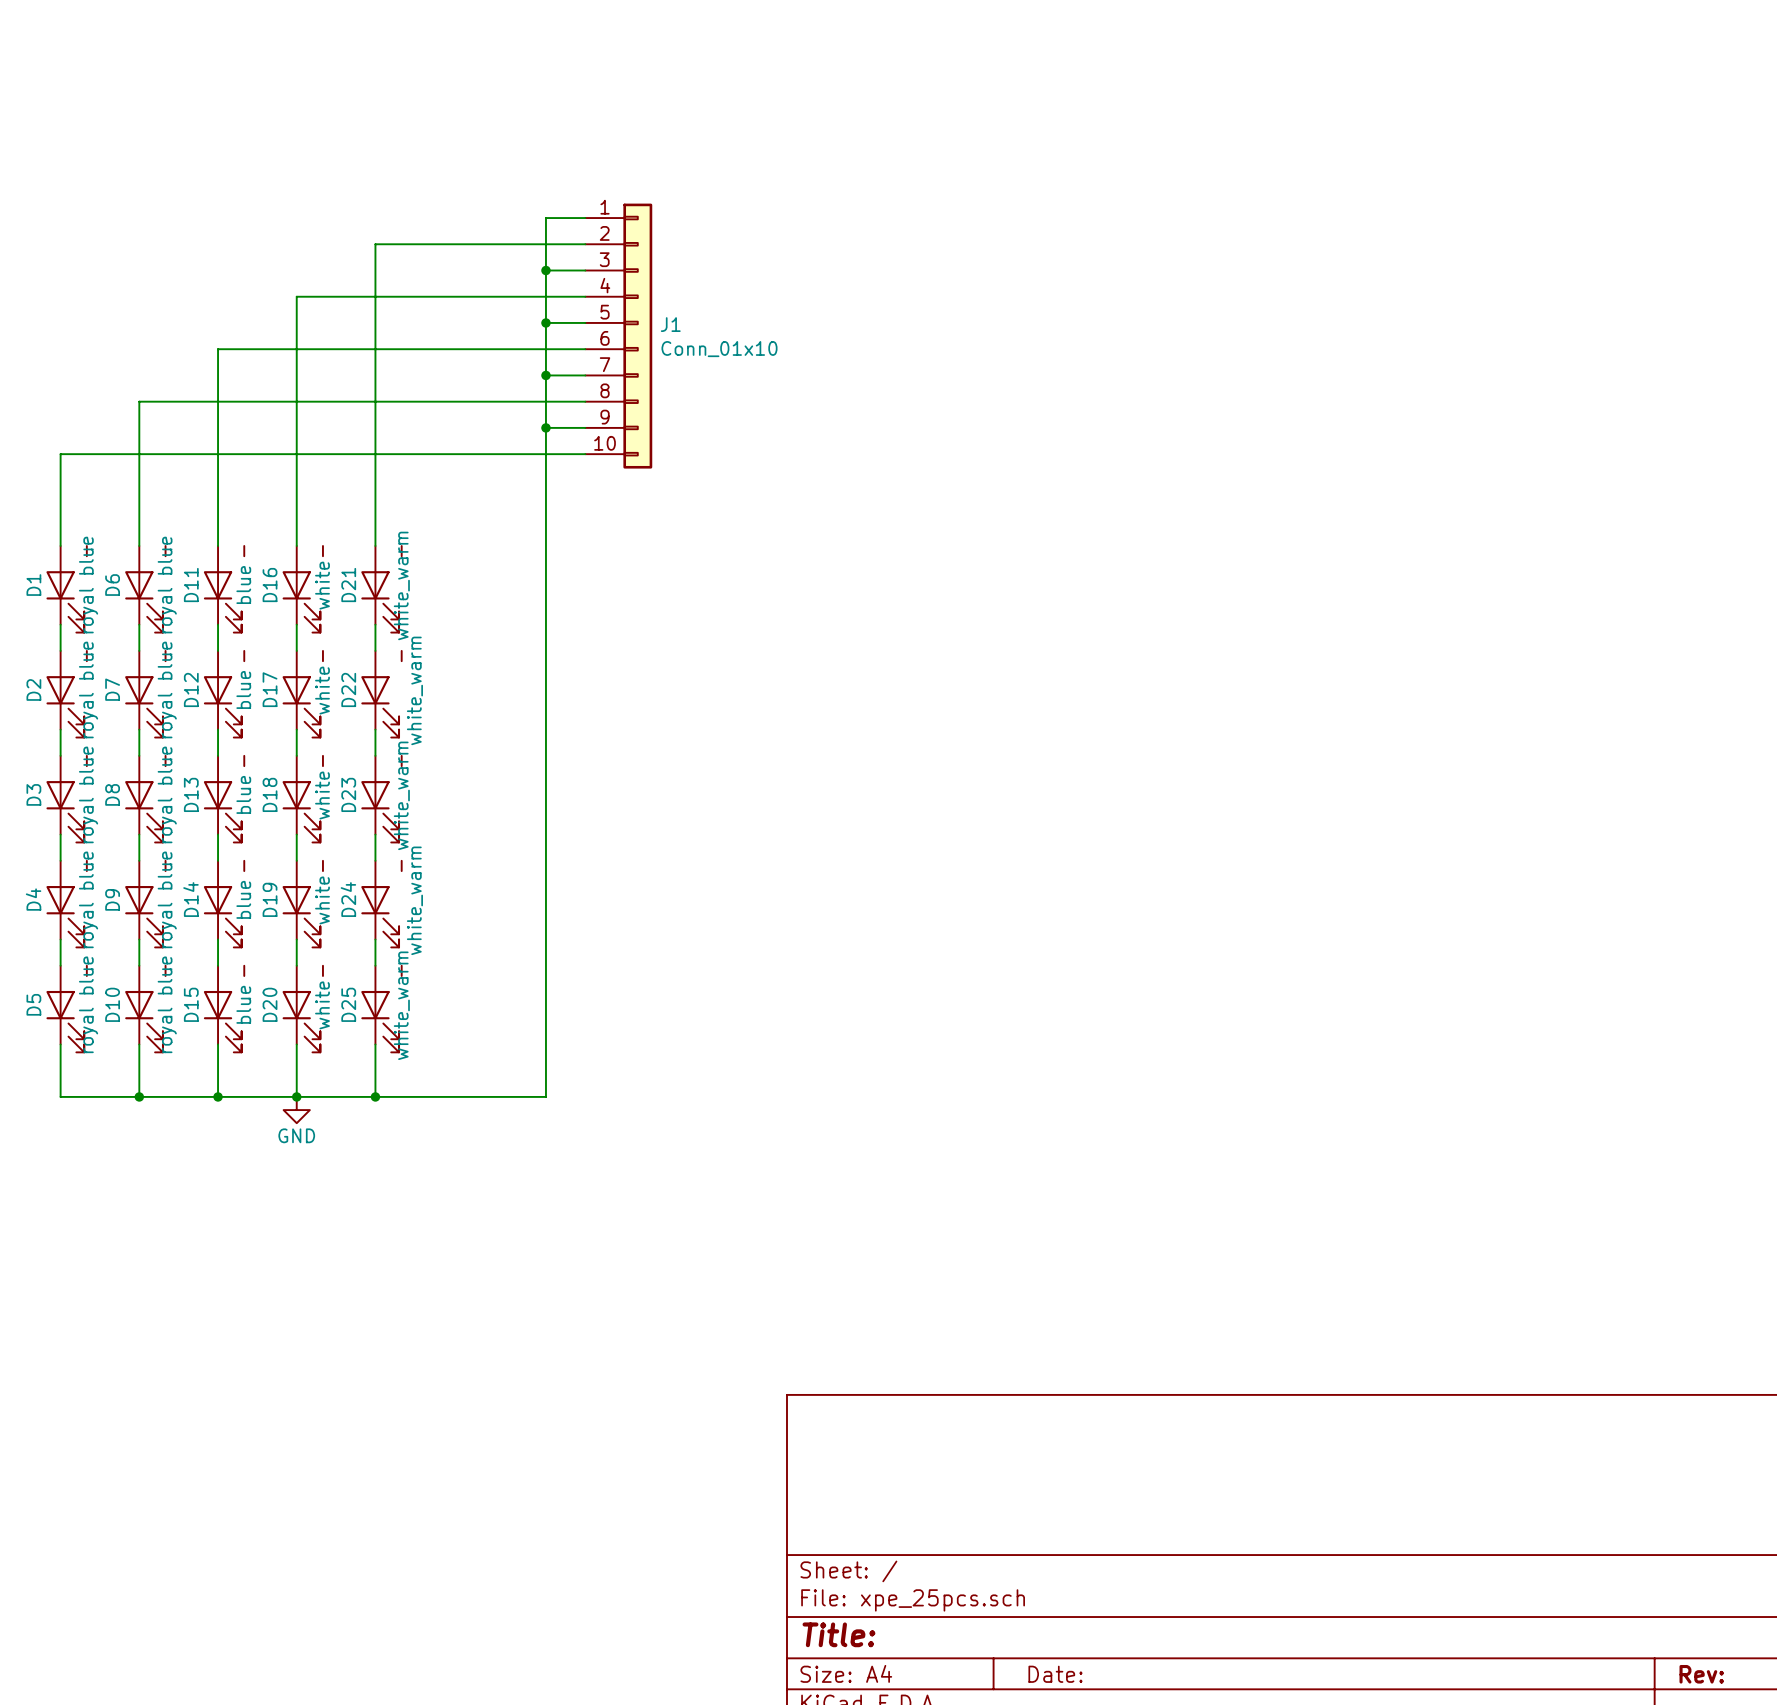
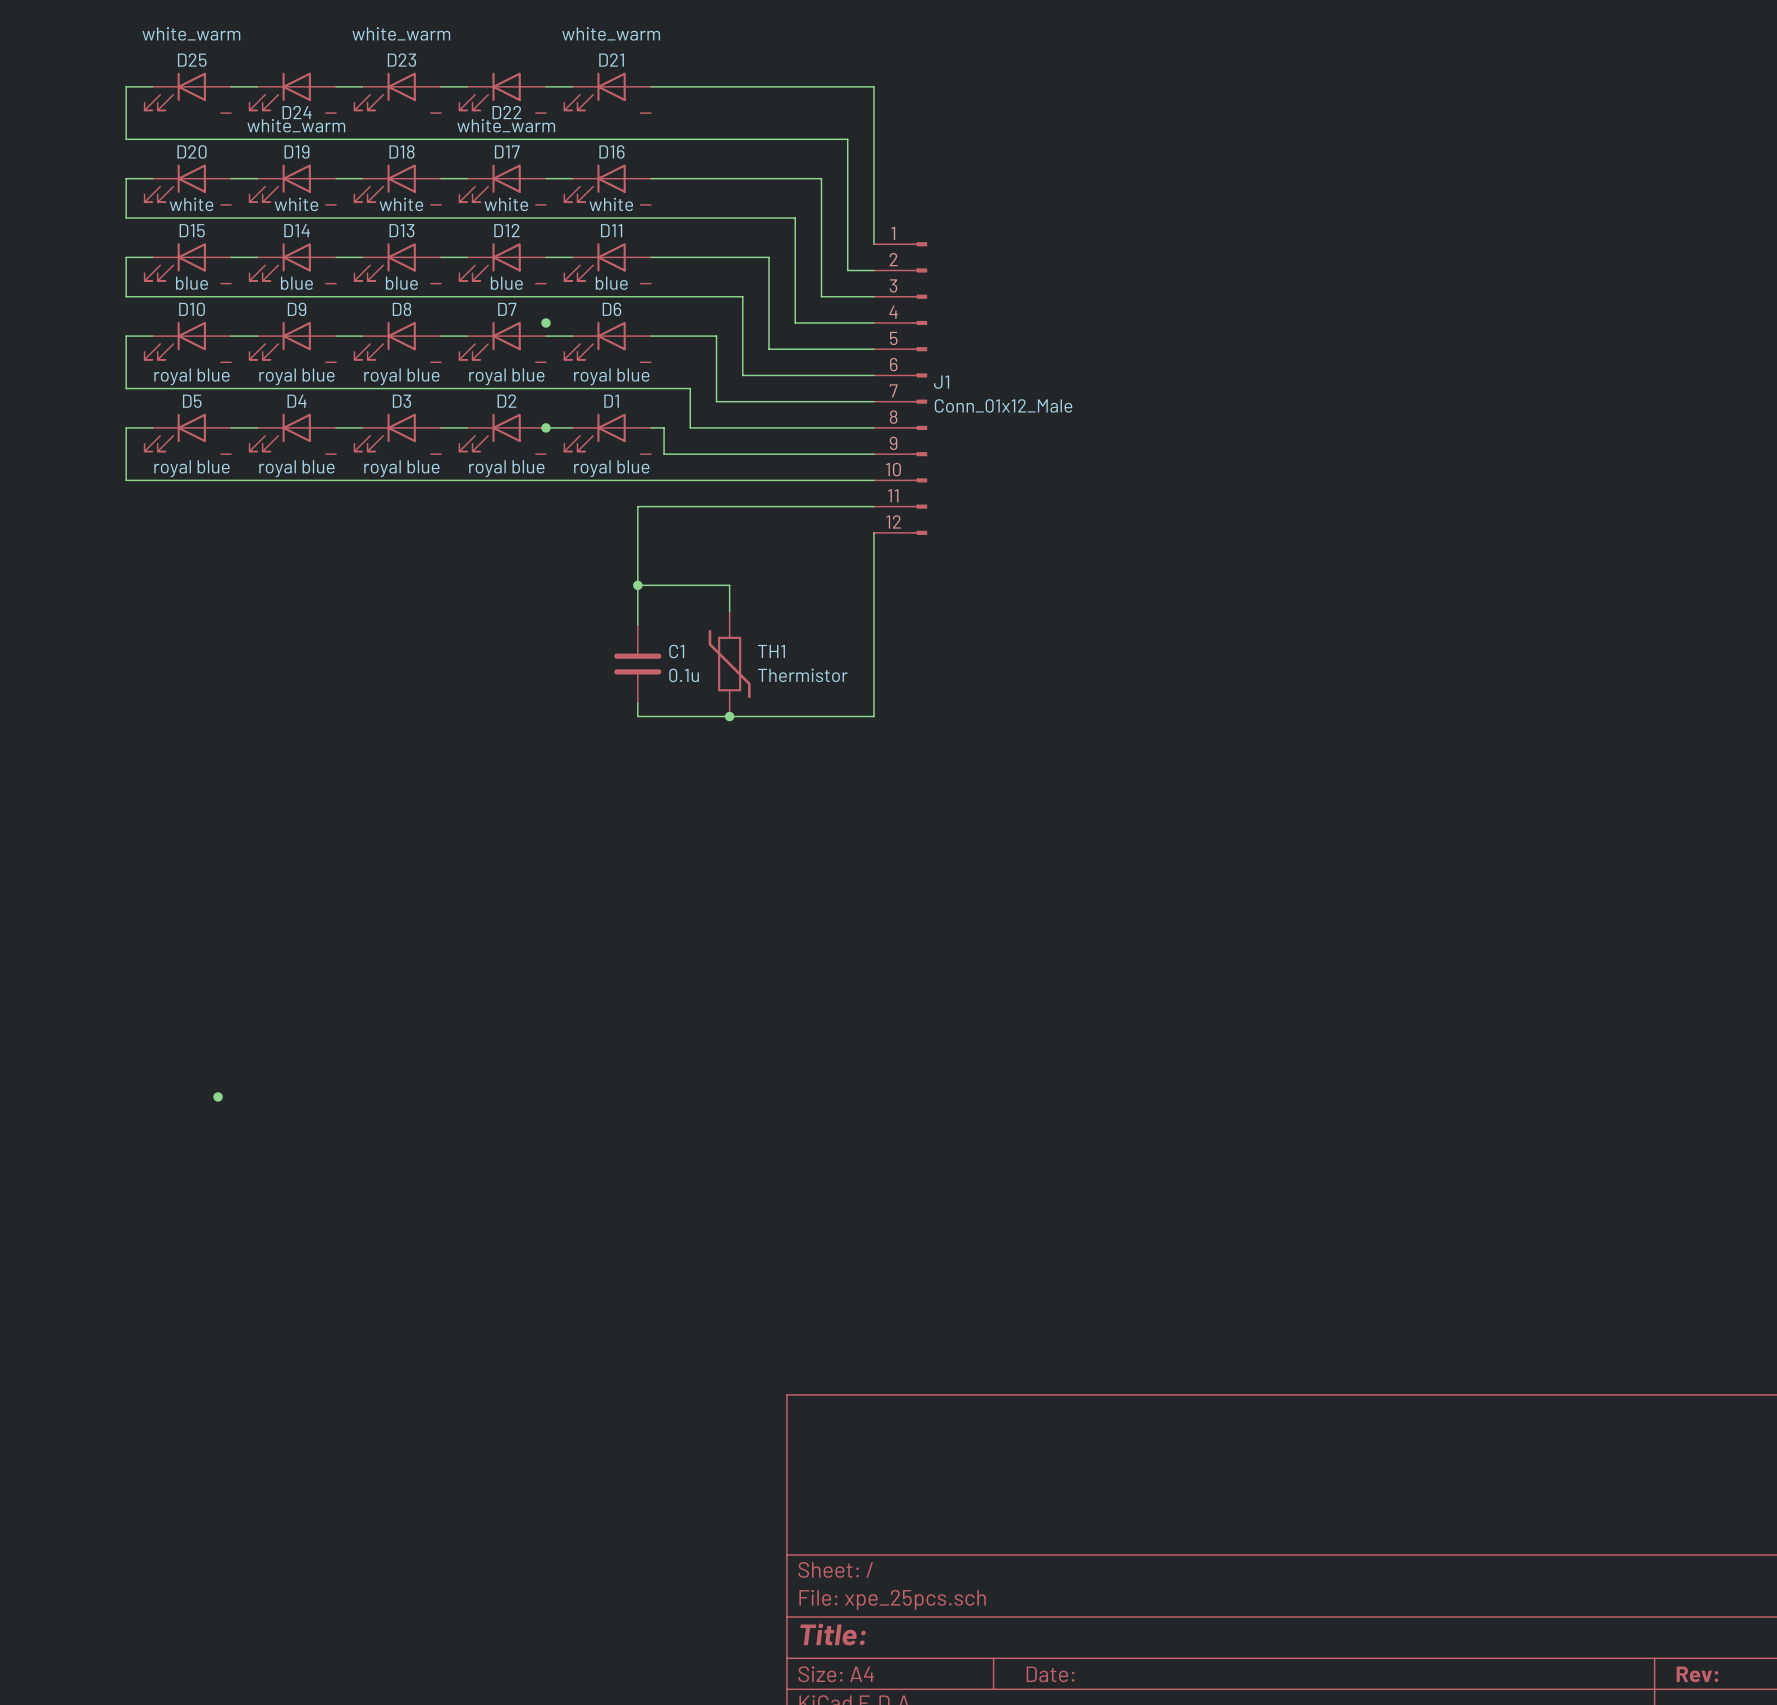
wire: none -> (152, 86) (126, 86) (126, 139) (847, 139) (847, 270) (873, 270)
wire: none -> (231, 86) (257, 86)
wire: none -> (336, 86) (362, 86)
wire: none -> (441, 86) (467, 86)
wire: none -> (545, 86) (572, 86)
wire: none -> (650, 86) (873, 86) (873, 244)
wire: none -> (231, 178) (257, 178)
wire: none -> (336, 178) (362, 178)
wire: none -> (441, 178) (467, 178)
wire: none -> (545, 178) (572, 178)
wire: none -> (650, 178) (821, 178) (821, 296) (873, 296)
J1 symbol: [585, 203, 653, 469] -> [873, 242, 928, 535]
wire: (545, 218) (545, 1096) (60, 1096) (60, 1044) -> (545, 218) (126, 218) (126, 178) (152, 178)
wire: none -> (585, 218) (795, 218) (795, 322) (873, 322)
wire: (585, 244) (375, 244) (375, 545) -> none
wire: none -> (231, 257) (257, 257)
wire: none -> (336, 257) (362, 257)
wire: none -> (441, 257) (467, 257)
wire: none -> (545, 257) (572, 257)
wire: none -> (650, 257) (768, 257) (768, 349) (873, 349)
wire: (545, 270) (585, 270) -> none
junction: (545, 270) -> none
wire: (296, 296) (296, 545) -> (296, 296) (126, 296) (126, 257) (152, 257)
wire: none -> (585, 296) (742, 296) (742, 375) (873, 375)
wire: (545, 322) (585, 322) -> none
wire: none -> (152, 336) (126, 336) (126, 388) (690, 388) (690, 427) (873, 427)
wire: none -> (231, 336) (257, 336)
wire: none -> (336, 336) (362, 336)
wire: none -> (441, 336) (467, 336)
wire: none -> (545, 336) (572, 336)
wire: none -> (650, 336) (716, 336) (716, 401) (873, 401)
wire: (585, 349) (218, 349) (218, 545) -> none
J1 value: Conn_01x10 (719, 349) -> Conn_01x12_Male (1003, 405)
wire: (545, 375) (585, 375) -> none
junction: (545, 375) -> none
wire: (585, 401) (139, 401) (139, 545) -> none
wire: none -> (152, 427) (126, 427) (126, 480) (873, 480)
wire: none -> (231, 427) (257, 427)
wire: none -> (336, 427) (362, 427)
wire: none -> (441, 427) (467, 427)
wire: none -> (650, 427) (664, 427) (664, 454) (873, 454)
wire: (585, 454) (60, 454) (60, 545) -> none
wire: none -> (873, 506) (637, 506) (637, 624)
wire: none -> (873, 532) (873, 716) (637, 716) (637, 703)
D21 value position: white_warm (401, 585) -> white_warm (611, 33)
wire: none -> (637, 585) (729, 585) (729, 611)
junction: none -> (637, 585)
D1 position: (66, 589) -> (607, 433)
D6 position: (145, 589) -> (607, 342)
D11 position: (224, 589) -> (607, 263)
D16 position: (302, 589) -> (607, 184)
D21 position: (381, 589) -> (607, 92)
D1 rotation: 0° (65, 601) -> 90° clockwise (595, 432)
D6 rotation: 0° (144, 601) -> 90° clockwise (595, 340)
D11 rotation: 0° (222, 601) -> 90° clockwise (595, 262)
D16 rotation: 0° (301, 601) -> 90° clockwise (595, 183)
D21 rotation: 0° (380, 601) -> 90° clockwise (595, 91)
wire: (60, 624) (60, 650) -> none
wire: (139, 624) (139, 650) -> none
wire: (218, 624) (218, 650) -> none
wire: (296, 624) (296, 650) -> none
wire: (375, 624) (375, 650) -> none
C1: none -> 0.1u (637, 664)
TH1: none -> Thermistor (729, 664)
D22 name position: D22 (348, 689) -> D22 (506, 112)
D2 position: (66, 694) -> (502, 433)
D7 position: (145, 694) -> (502, 342)
D12 position: (224, 694) -> (502, 263)
D17 position: (302, 694) -> (502, 184)
D22 position: (381, 694) -> (502, 92)
D2 rotation: 0° (65, 706) -> 90° clockwise (490, 432)
D7 rotation: 0° (144, 706) -> 90° clockwise (490, 340)
D12 rotation: 0° (222, 706) -> 90° clockwise (490, 262)
D17 rotation: 0° (301, 706) -> 90° clockwise (490, 183)
D22 rotation: 0° (380, 706) -> 90° clockwise (490, 91)
junction: none -> (729, 716)
wire: (60, 729) (60, 755) -> none
wire: (139, 729) (139, 755) -> none
wire: (218, 729) (218, 755) -> none
wire: (296, 729) (296, 755) -> none
wire: (375, 729) (375, 755) -> none
D23 value position: white_warm (401, 795) -> white_warm (401, 33)
D3 position: (66, 799) -> (397, 433)
D8 position: (145, 799) -> (397, 342)
D13 position: (224, 799) -> (397, 263)
D18 position: (302, 799) -> (397, 184)
D23 position: (381, 799) -> (397, 92)
D3 rotation: 0° (65, 811) -> 90° clockwise (385, 432)
D8 rotation: 0° (144, 811) -> 90° clockwise (385, 340)
D13 rotation: 0° (222, 811) -> 90° clockwise (385, 262)
D18 rotation: 0° (301, 811) -> 90° clockwise (385, 183)
D23 rotation: 0° (380, 811) -> 90° clockwise (385, 91)
wire: (60, 834) (60, 860) -> none
wire: (139, 834) (139, 860) -> none
wire: (218, 834) (218, 860) -> none
wire: (296, 834) (296, 860) -> none
wire: (375, 834) (375, 860) -> none
D24 name position: D24 (348, 899) -> D24 (297, 112)
D4 position: (66, 904) -> (292, 433)
D9 position: (145, 904) -> (292, 342)
D14 position: (224, 904) -> (292, 263)
D19 position: (302, 904) -> (292, 184)
D24 position: (381, 904) -> (292, 92)
D4 rotation: 0° (65, 916) -> 90° clockwise (280, 432)
D9 rotation: 0° (144, 916) -> 90° clockwise (280, 340)
D14 rotation: 0° (222, 916) -> 90° clockwise (280, 262)
D19 rotation: 0° (301, 916) -> 90° clockwise (280, 183)
D24 rotation: 0° (380, 916) -> 90° clockwise (280, 91)
wire: (60, 939) (60, 965) -> none
wire: (139, 939) (139, 965) -> none
wire: (218, 939) (218, 965) -> none
wire: (296, 939) (296, 965) -> none
wire: (375, 939) (375, 965) -> none
D25 value position: white_warm (401, 1005) -> white_warm (191, 33)
D5 position: (66, 1009) -> (187, 433)
D10 position: (145, 1009) -> (187, 342)
D15 position: (224, 1009) -> (187, 263)
D20 position: (302, 1009) -> (187, 184)
D25 position: (381, 1009) -> (187, 92)
D5 rotation: 0° (65, 1021) -> 90° clockwise (175, 432)
D10 rotation: 0° (144, 1021) -> 90° clockwise (175, 340)
D15 rotation: 0° (222, 1021) -> 90° clockwise (175, 262)
D20 rotation: 0° (301, 1021) -> 90° clockwise (175, 183)
D25 rotation: 0° (380, 1021) -> 90° clockwise (175, 91)
wire: (139, 1044) (139, 1096) -> none
wire: (218, 1044) (218, 1096) -> none
wire: (296, 1044) (296, 1096) -> none
wire: (375, 1044) (375, 1096) -> none
junction: (139, 1096) -> none
junction: (296, 1096) -> none
junction: (375, 1096) -> none
power symbol: GND (296, 1110) -> none

